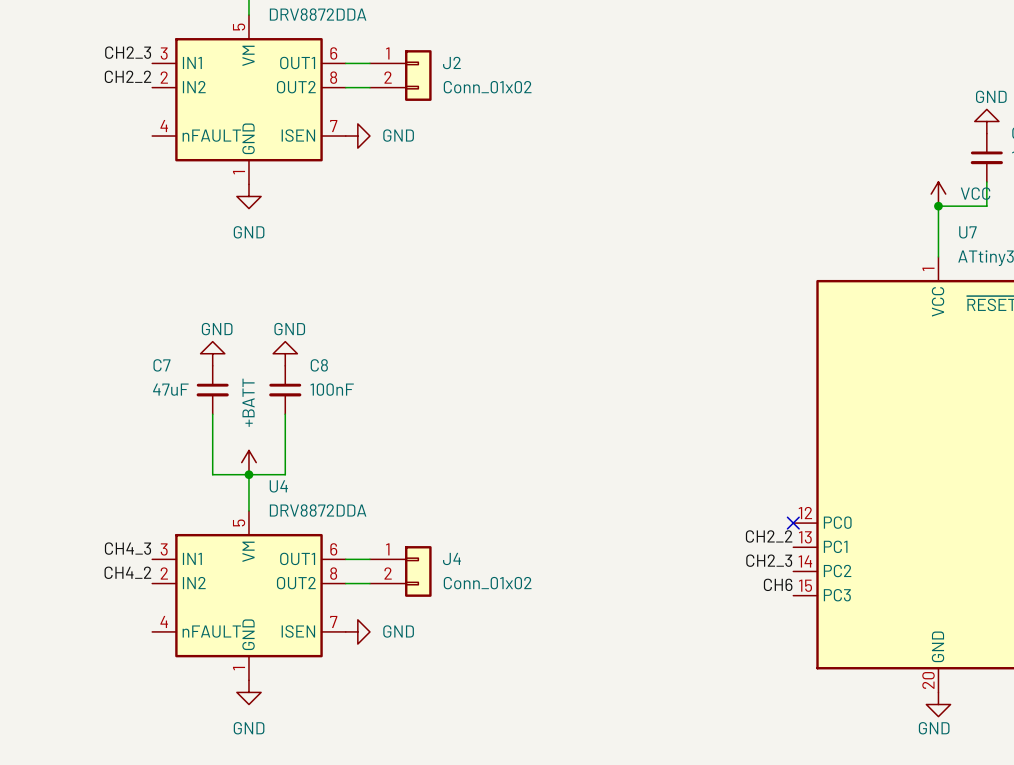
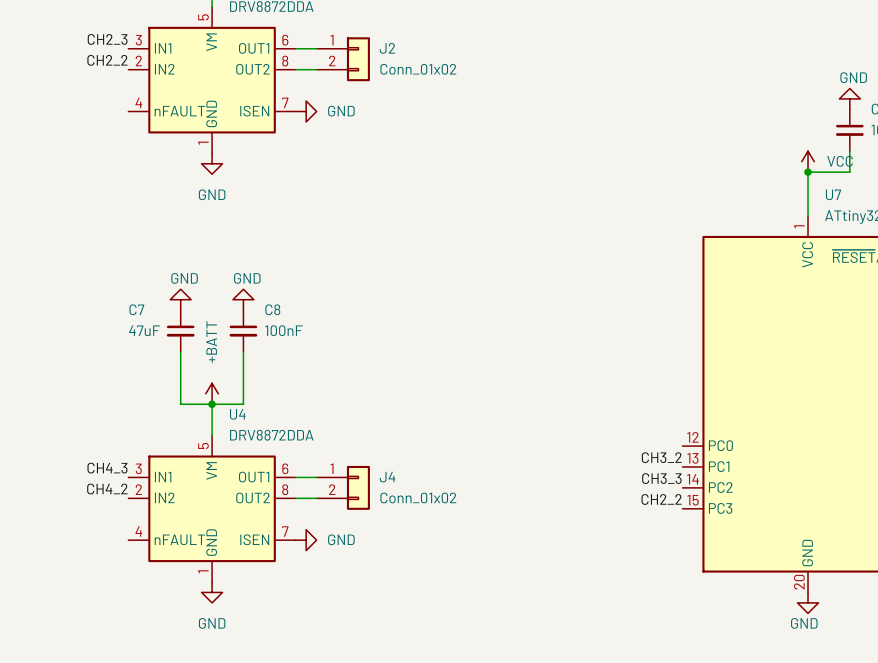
no-connect mark: (793, 523) -> none
label: CH2_2 (769, 536) -> CH3_2 (661, 457)
label: CH2_3 (769, 560) -> CH3_3 (661, 478)
label: CH6 (778, 584) -> CH2_2 (661, 499)

